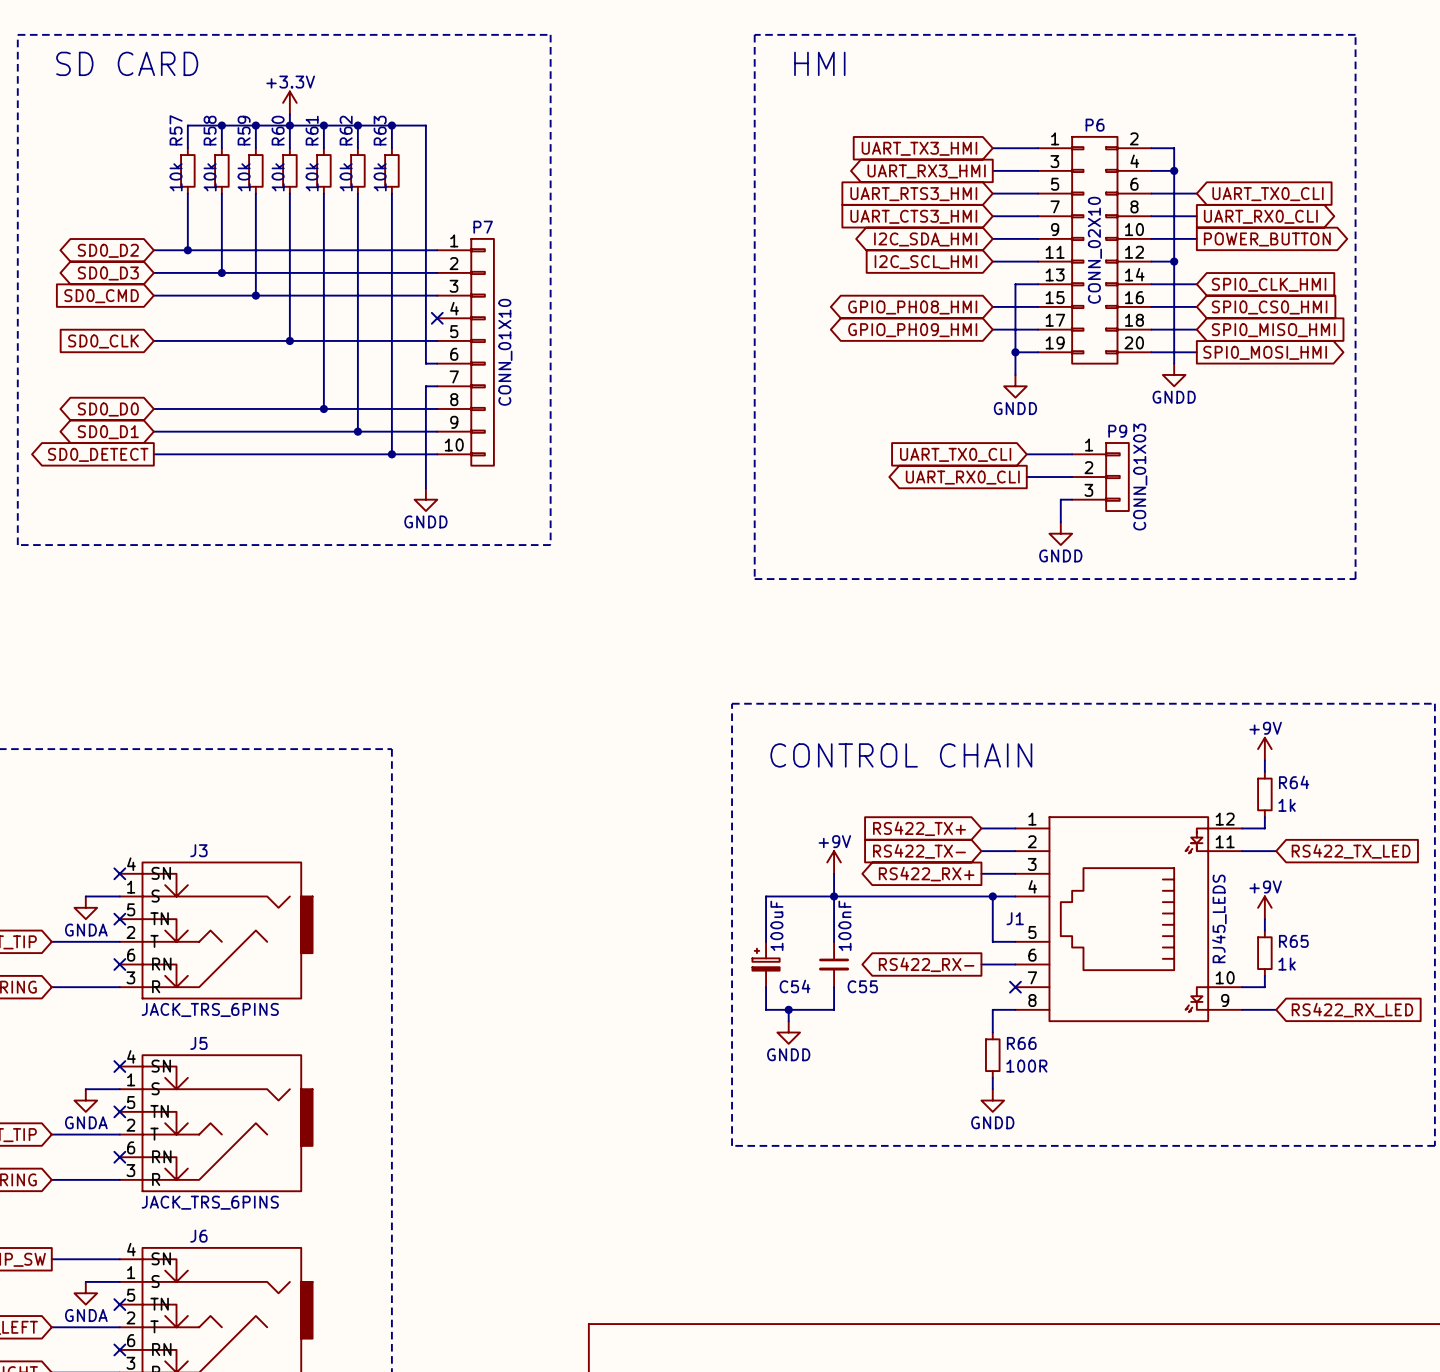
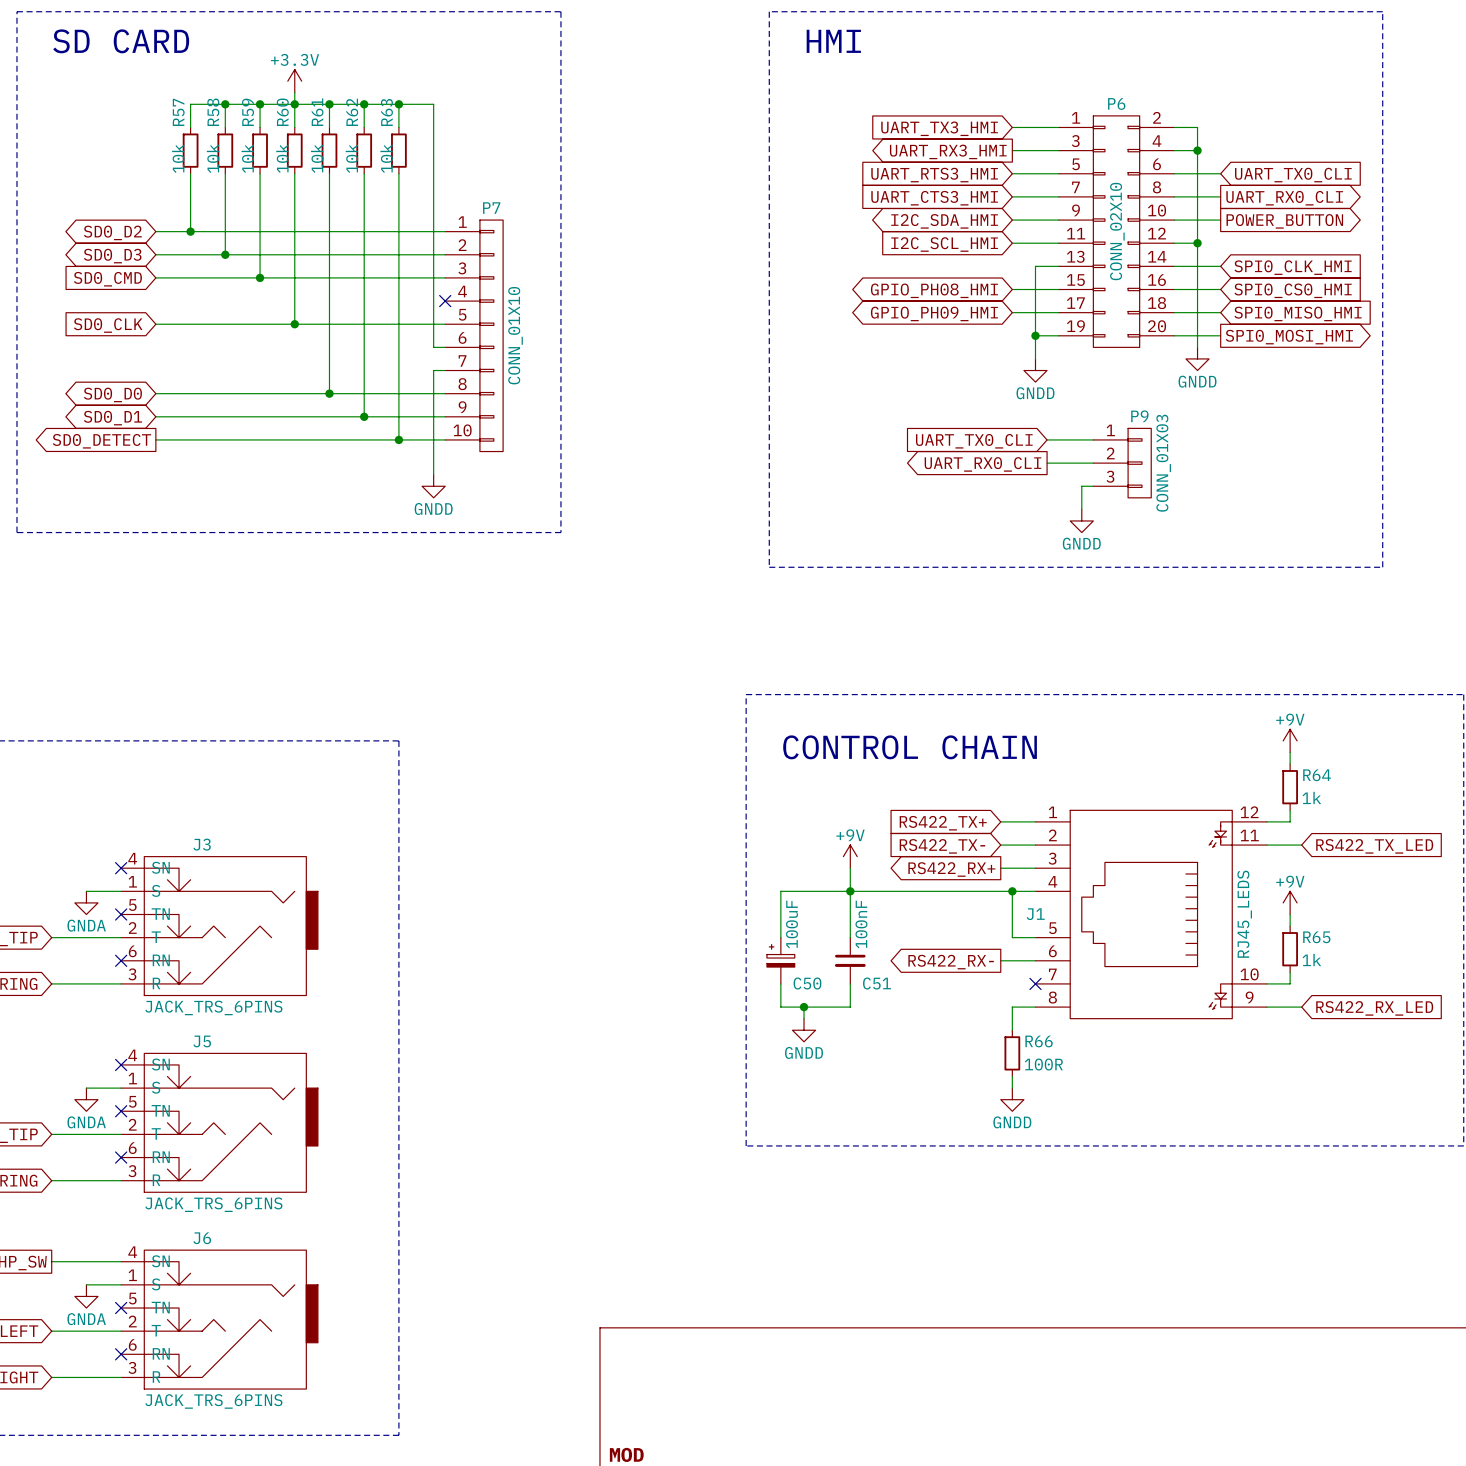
C54 name: C54 (795, 986) -> C50 (807, 983)
C55 name: C55 (862, 986) -> C51 (877, 983)

